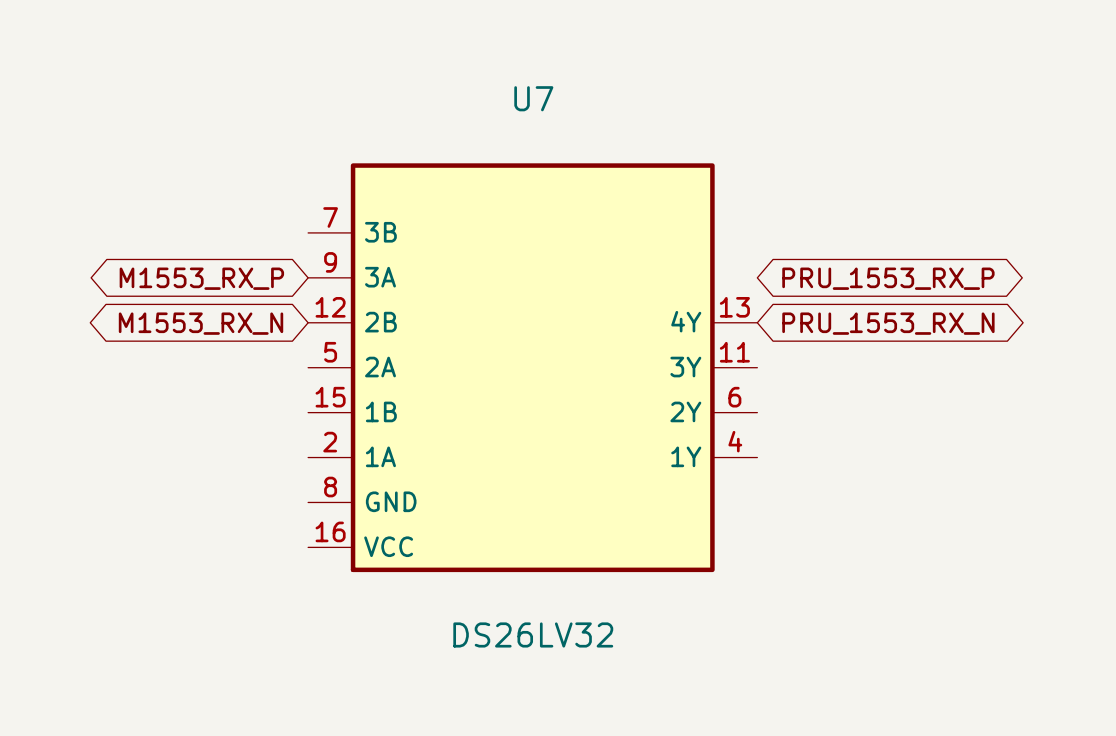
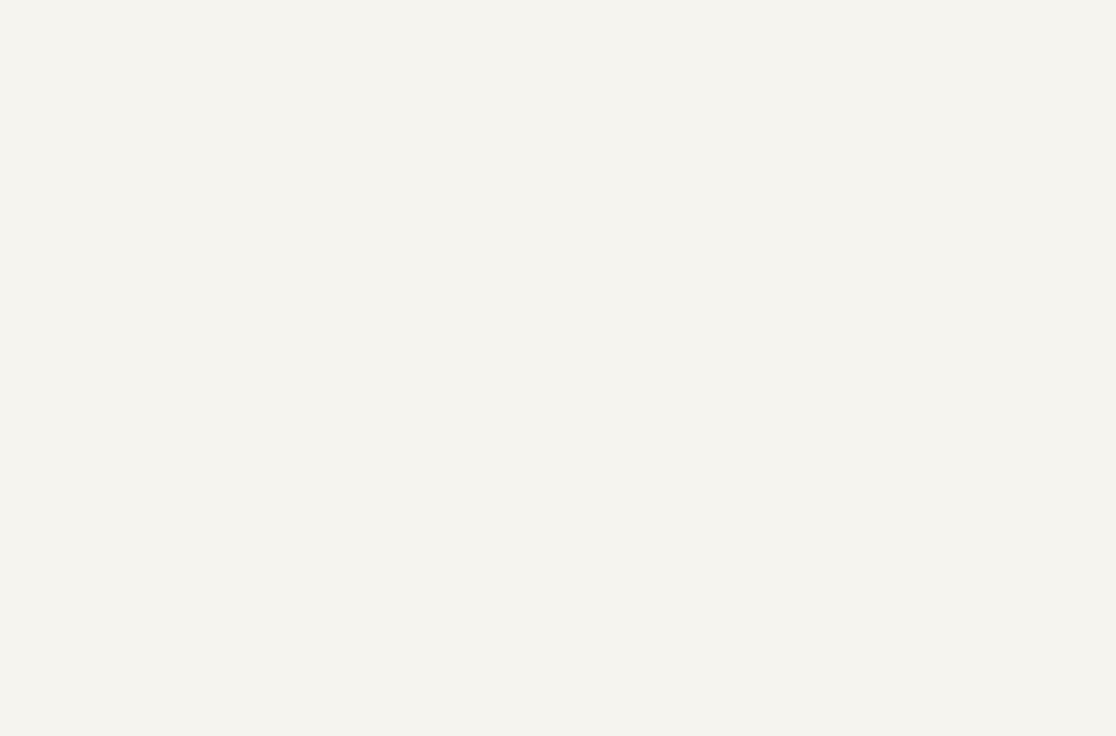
global label: M1553_RX_P (201, 278) -> none
global label: PRU_1553_RX_P (888, 278) -> none
global label: M1553_RX_N (201, 323) -> none
global label: PRU_1553_RX_N (888, 323) -> none
U7: DS26LV32 (532, 367) -> none

